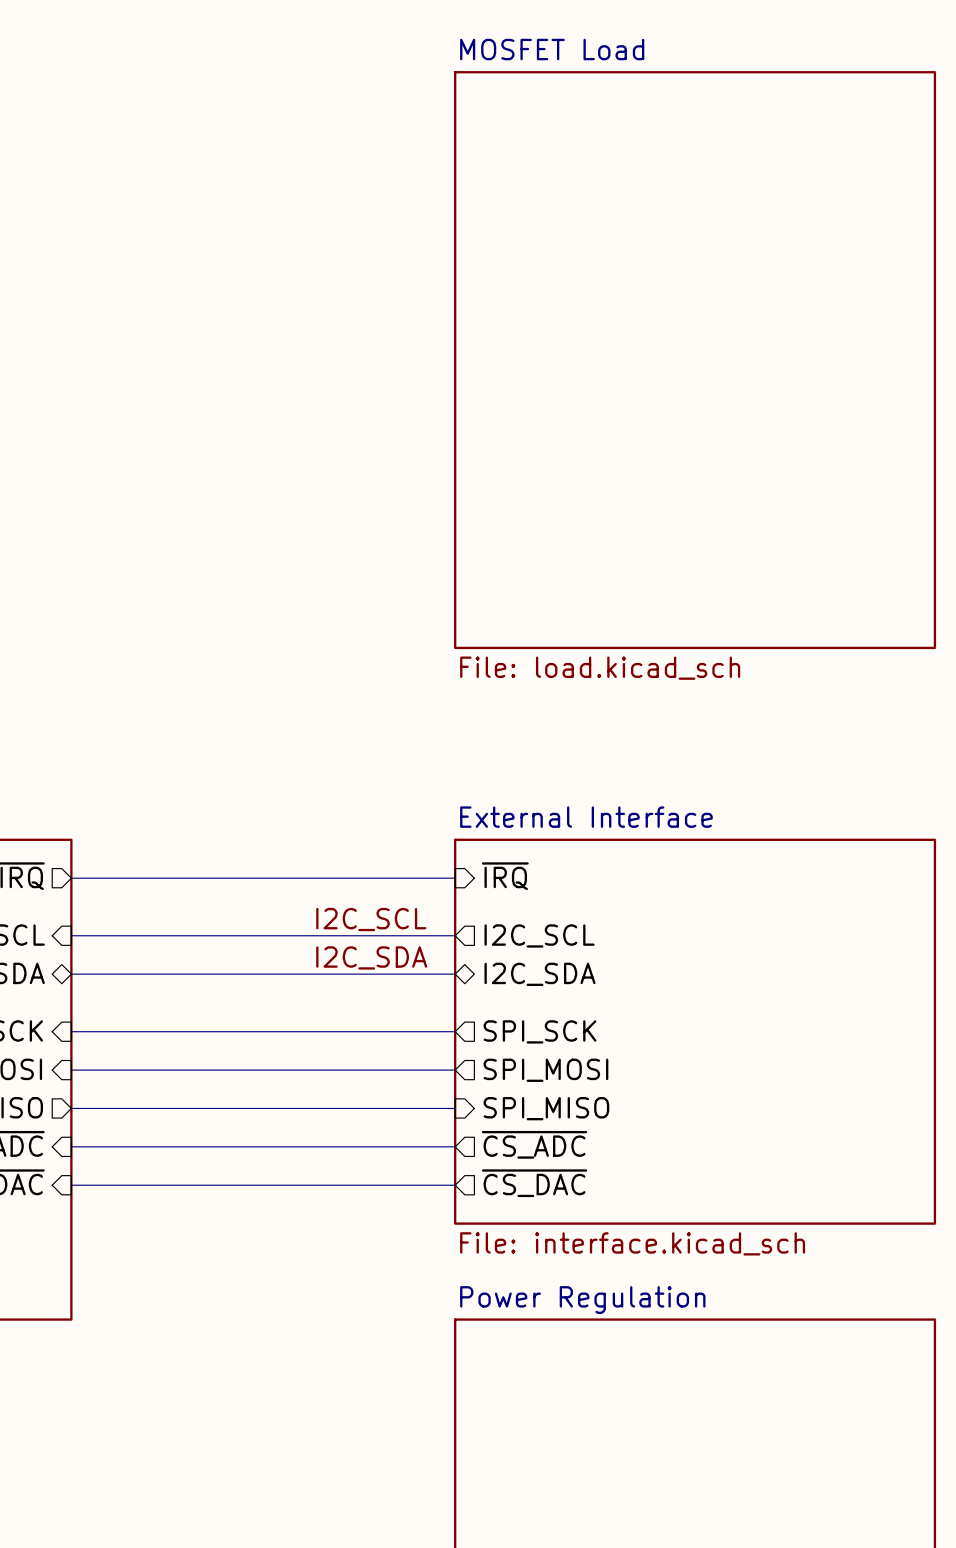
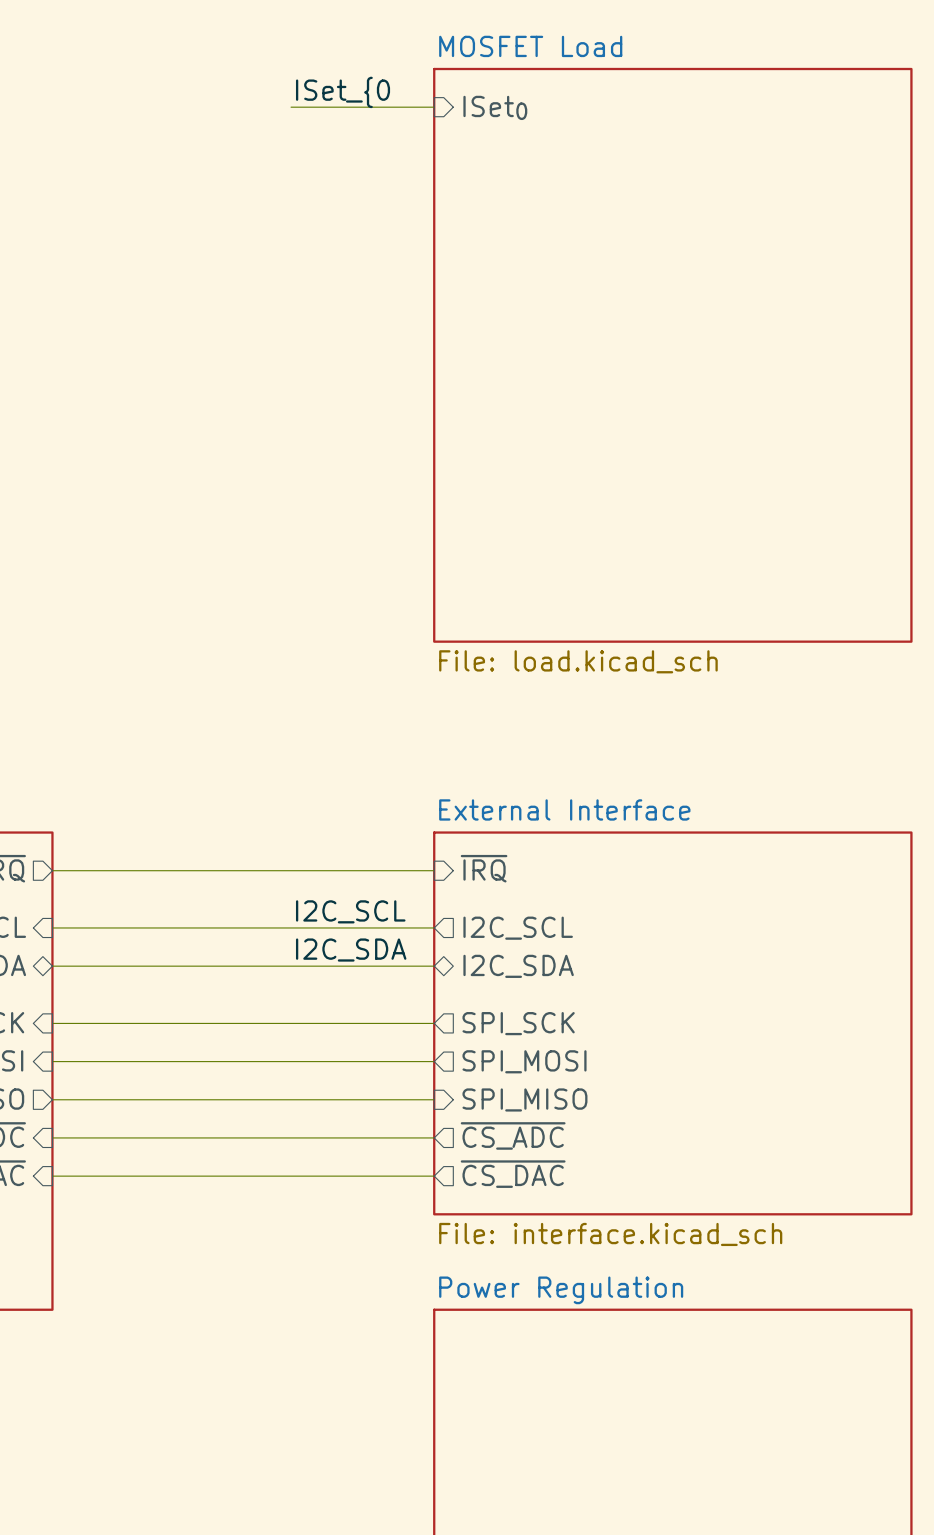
label: none -> ISet_{0 (343, 92)
wire: none -> (291, 107) (434, 107)
sheet pin: none -> ISet0 (495, 107)

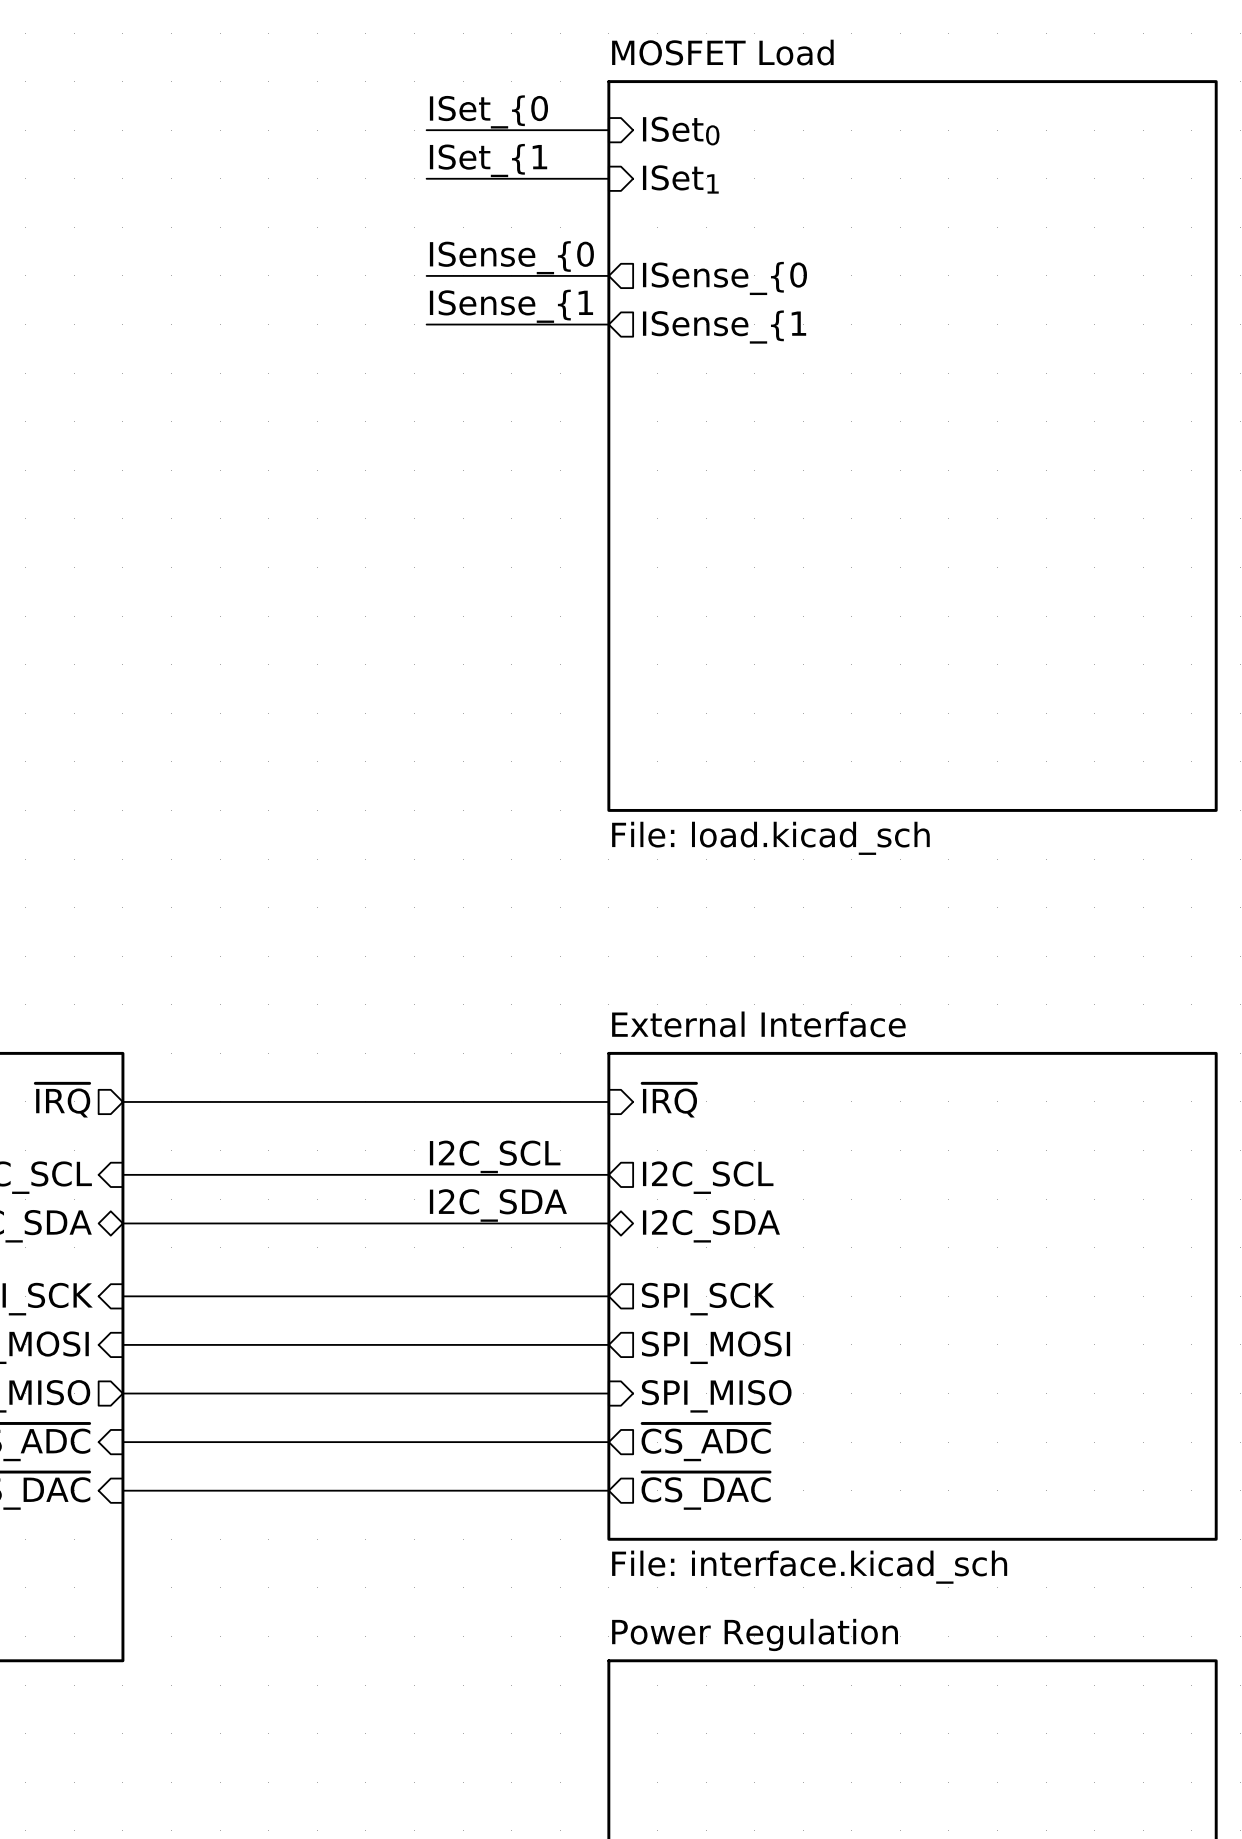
label: none -> ISet_{1 (488, 160)
wire: none -> (426, 178) (608, 178)
sheet pin: none -> ISet1 (680, 179)
label: none -> ISense_{0 (511, 257)
wire: none -> (426, 275) (608, 275)
sheet pin: none -> ISense_{0 (724, 278)
label: none -> ISense_{1 (511, 306)
wire: none -> (426, 324) (608, 324)
sheet pin: none -> ISense_{1 (724, 327)

